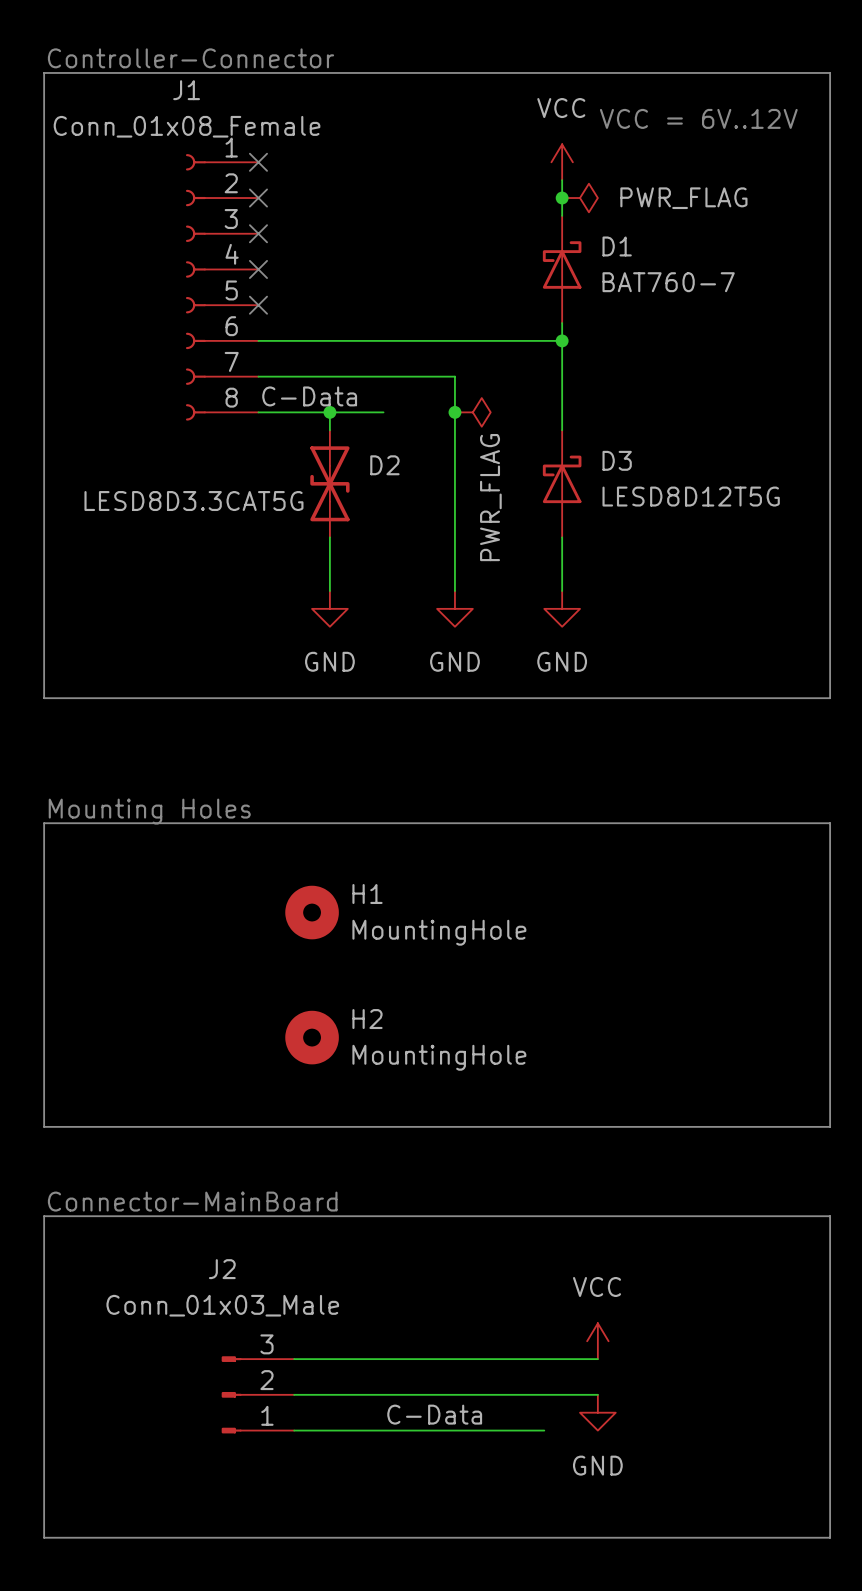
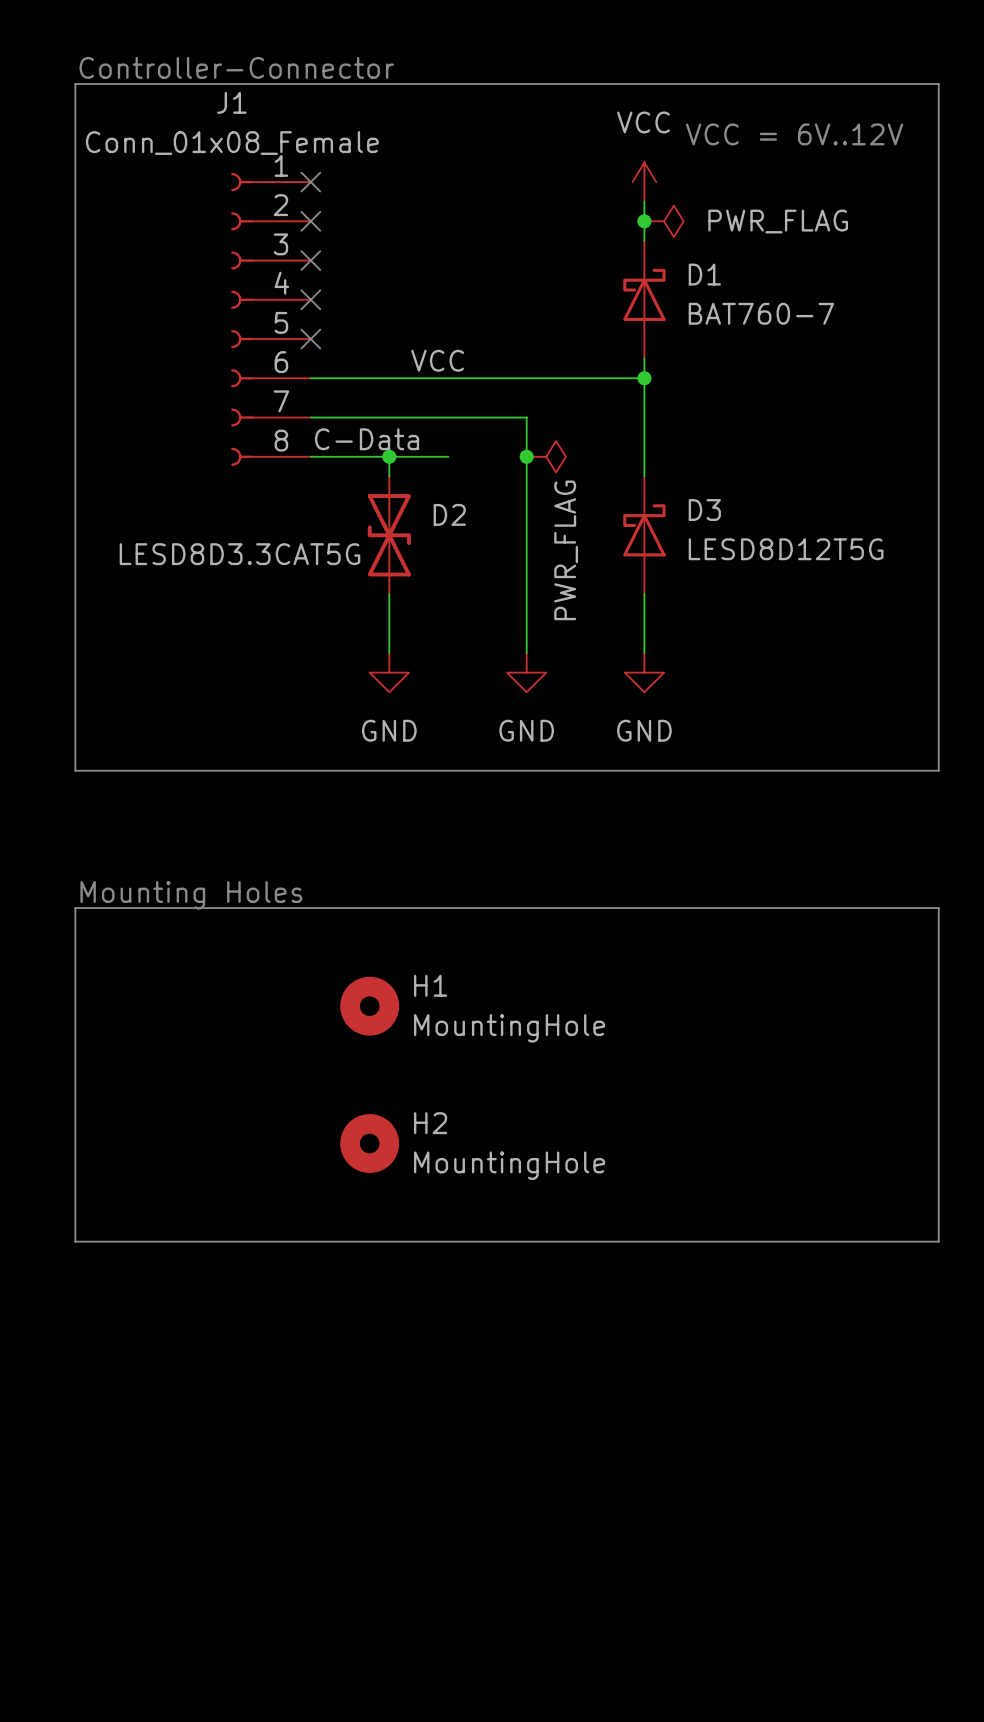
label: none -> VCC (437, 360)
text: Connector-MainBoard (192, 1201) -> none
line: (44, 1216) (830, 1216) (830, 1537) (44, 1537) (44, 1216) -> none
power symbol: VCC (597, 1341) -> none
wire: (294, 1359) (597, 1359) -> none
J2: Conn_01x03_Male (257, 1394) -> none
wire: (294, 1394) (597, 1394) -> none
power symbol: GND (597, 1412) -> none
label: C-Data (434, 1414) -> none
wire: (294, 1430) (544, 1430) -> none

